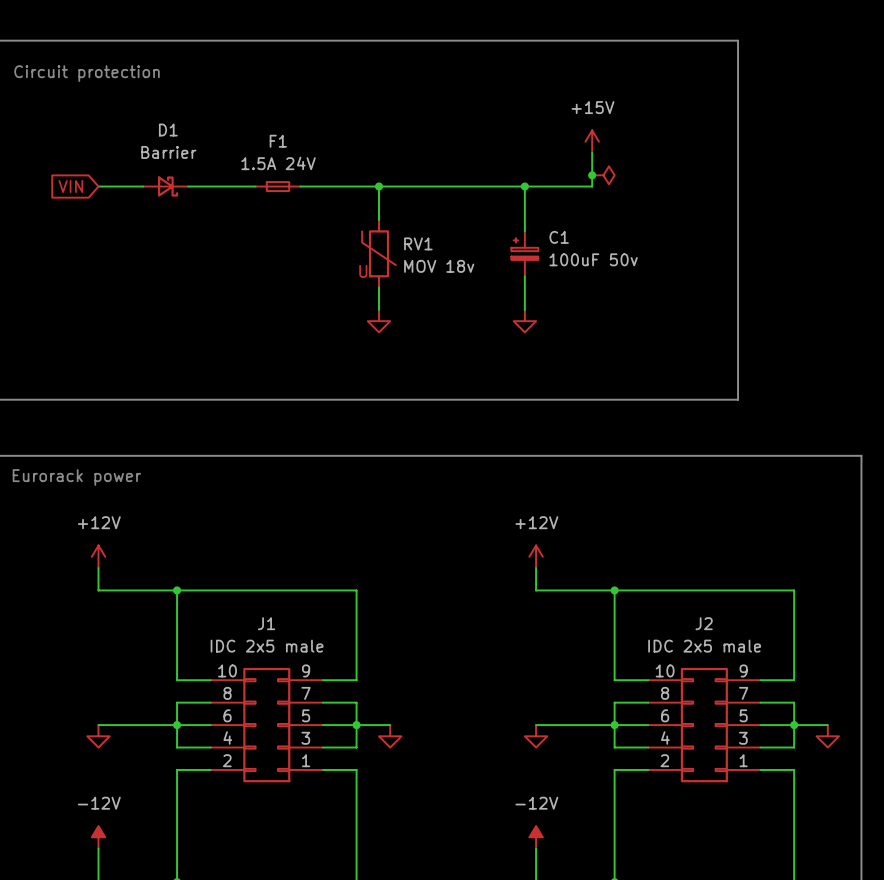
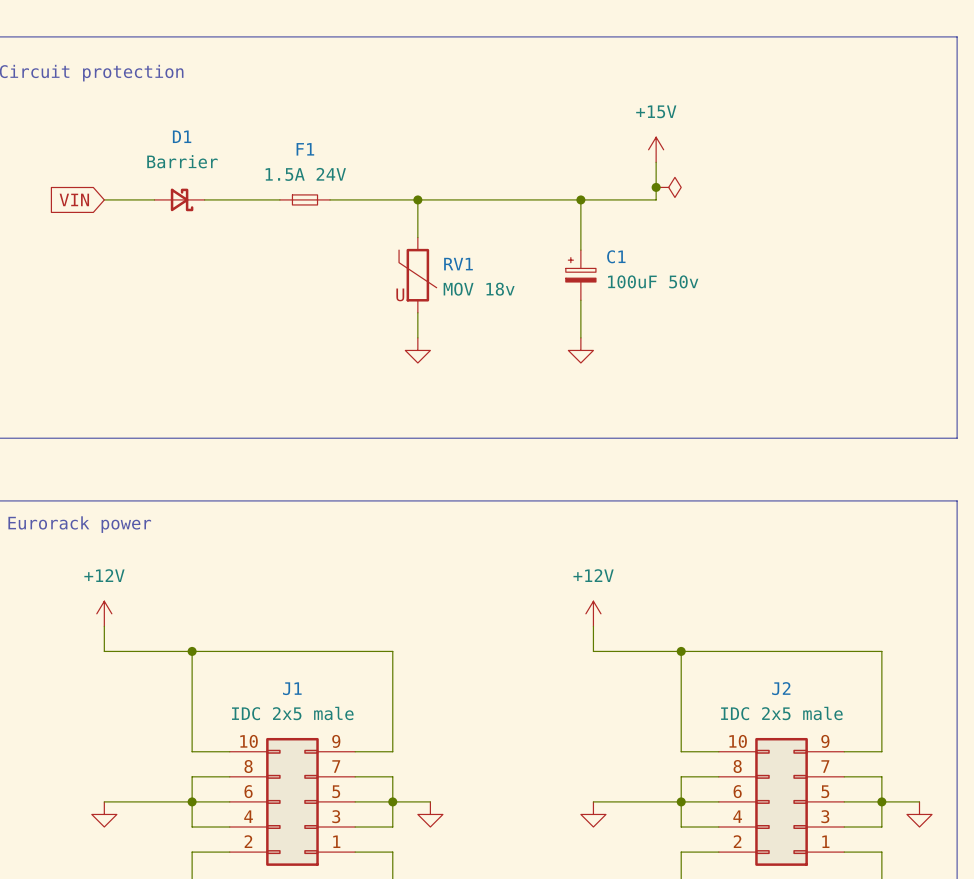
line: (738, 40) (738, 399) -> (819, 36) (957, 36) (957, 438) (819, 438)

